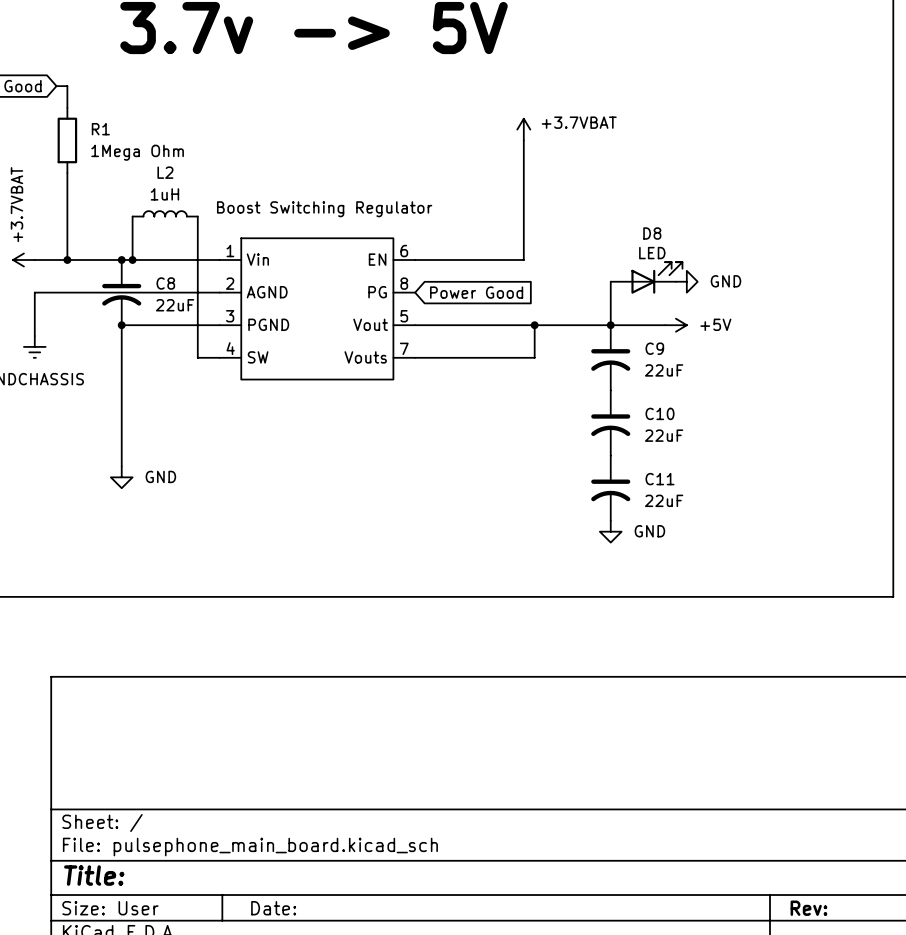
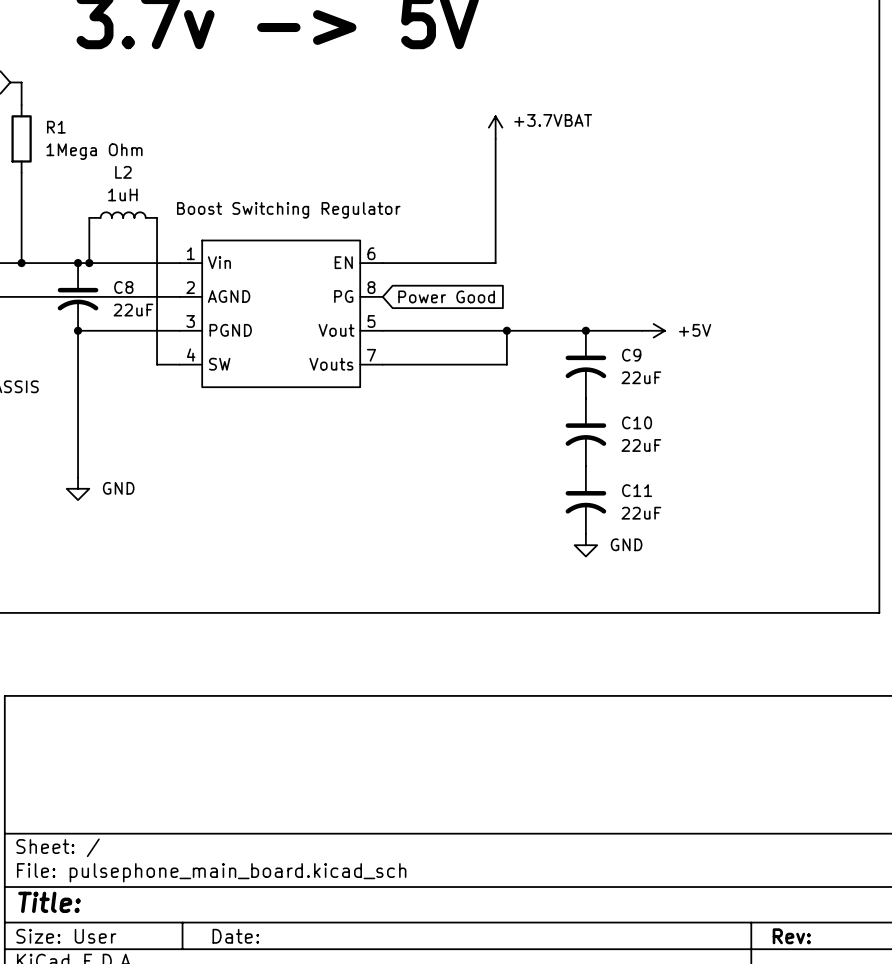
D8: LED (646, 277) -> none
wire: (610, 281) (610, 325) -> none
power symbol: GND (686, 281) -> none

